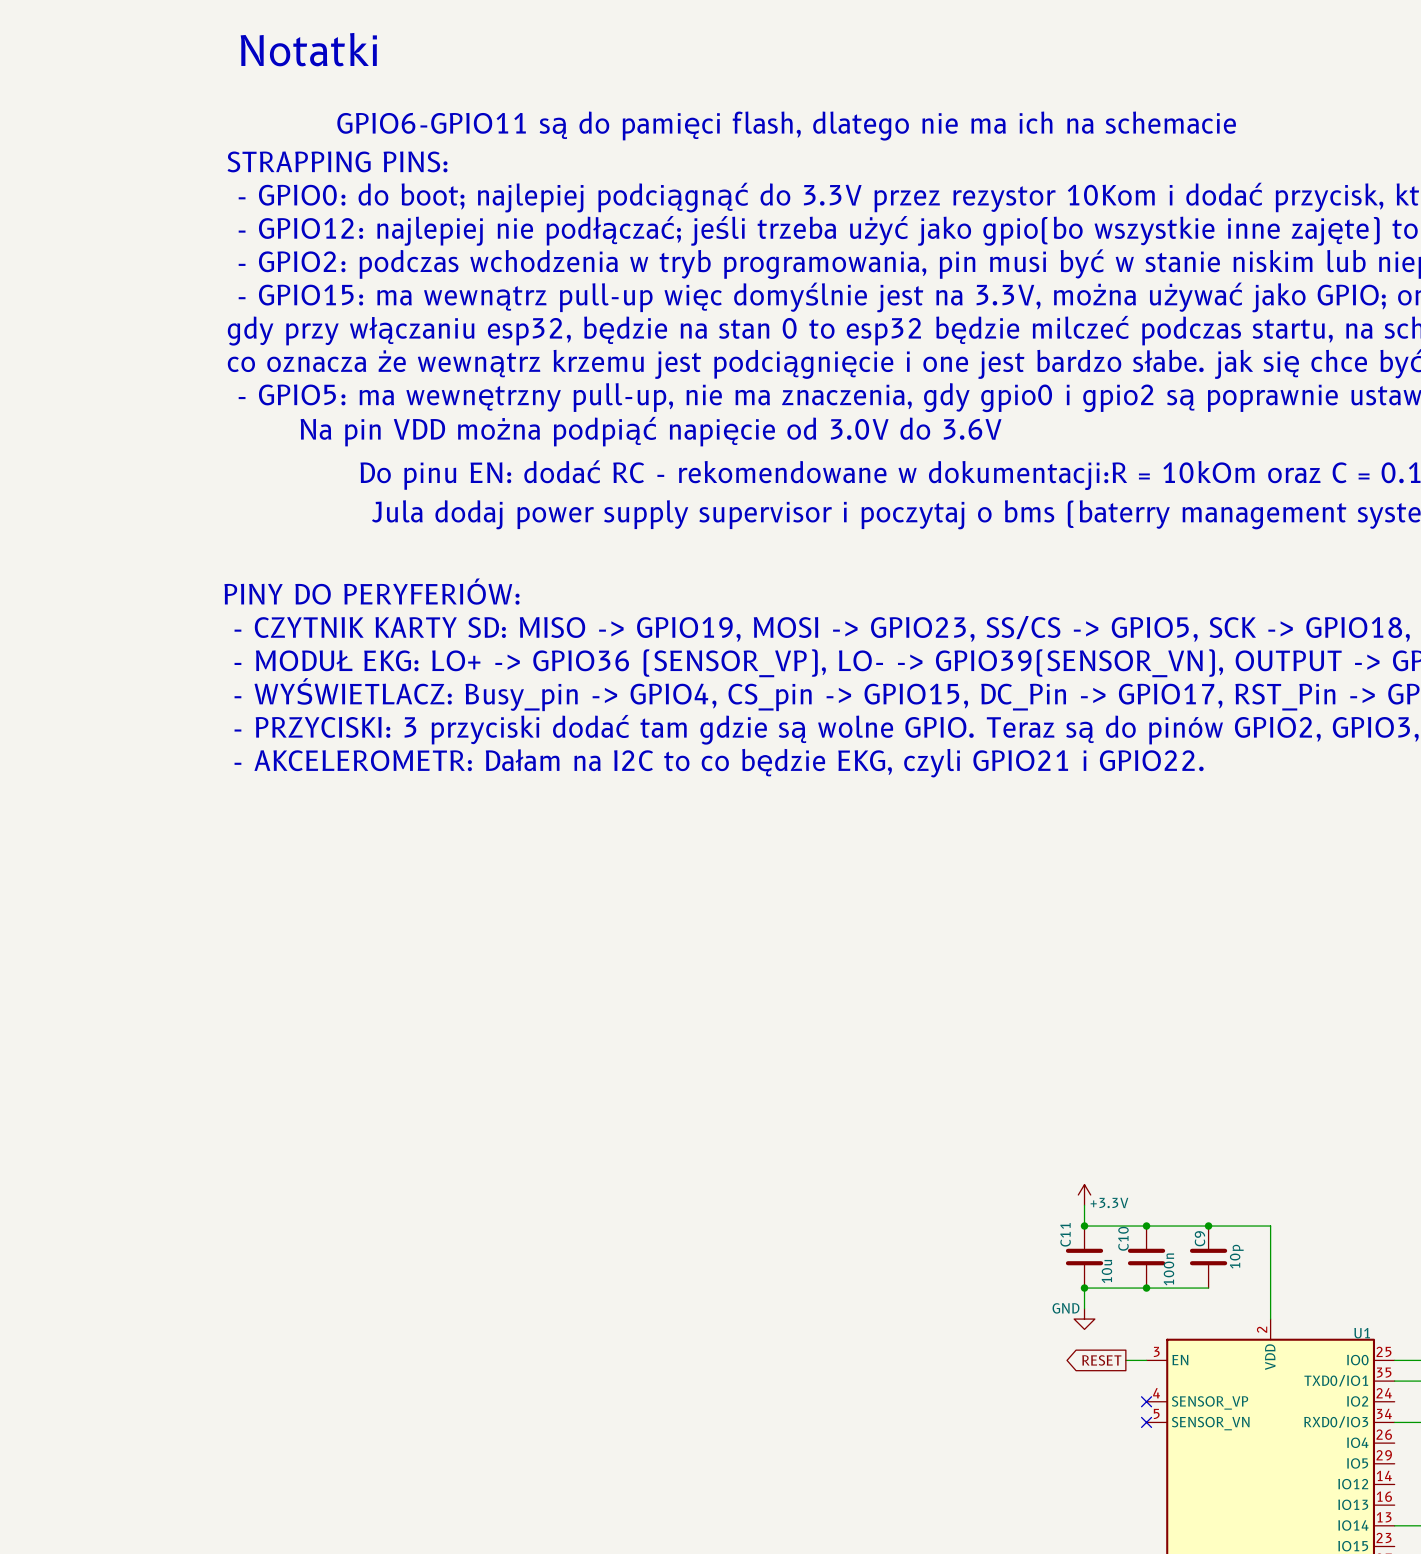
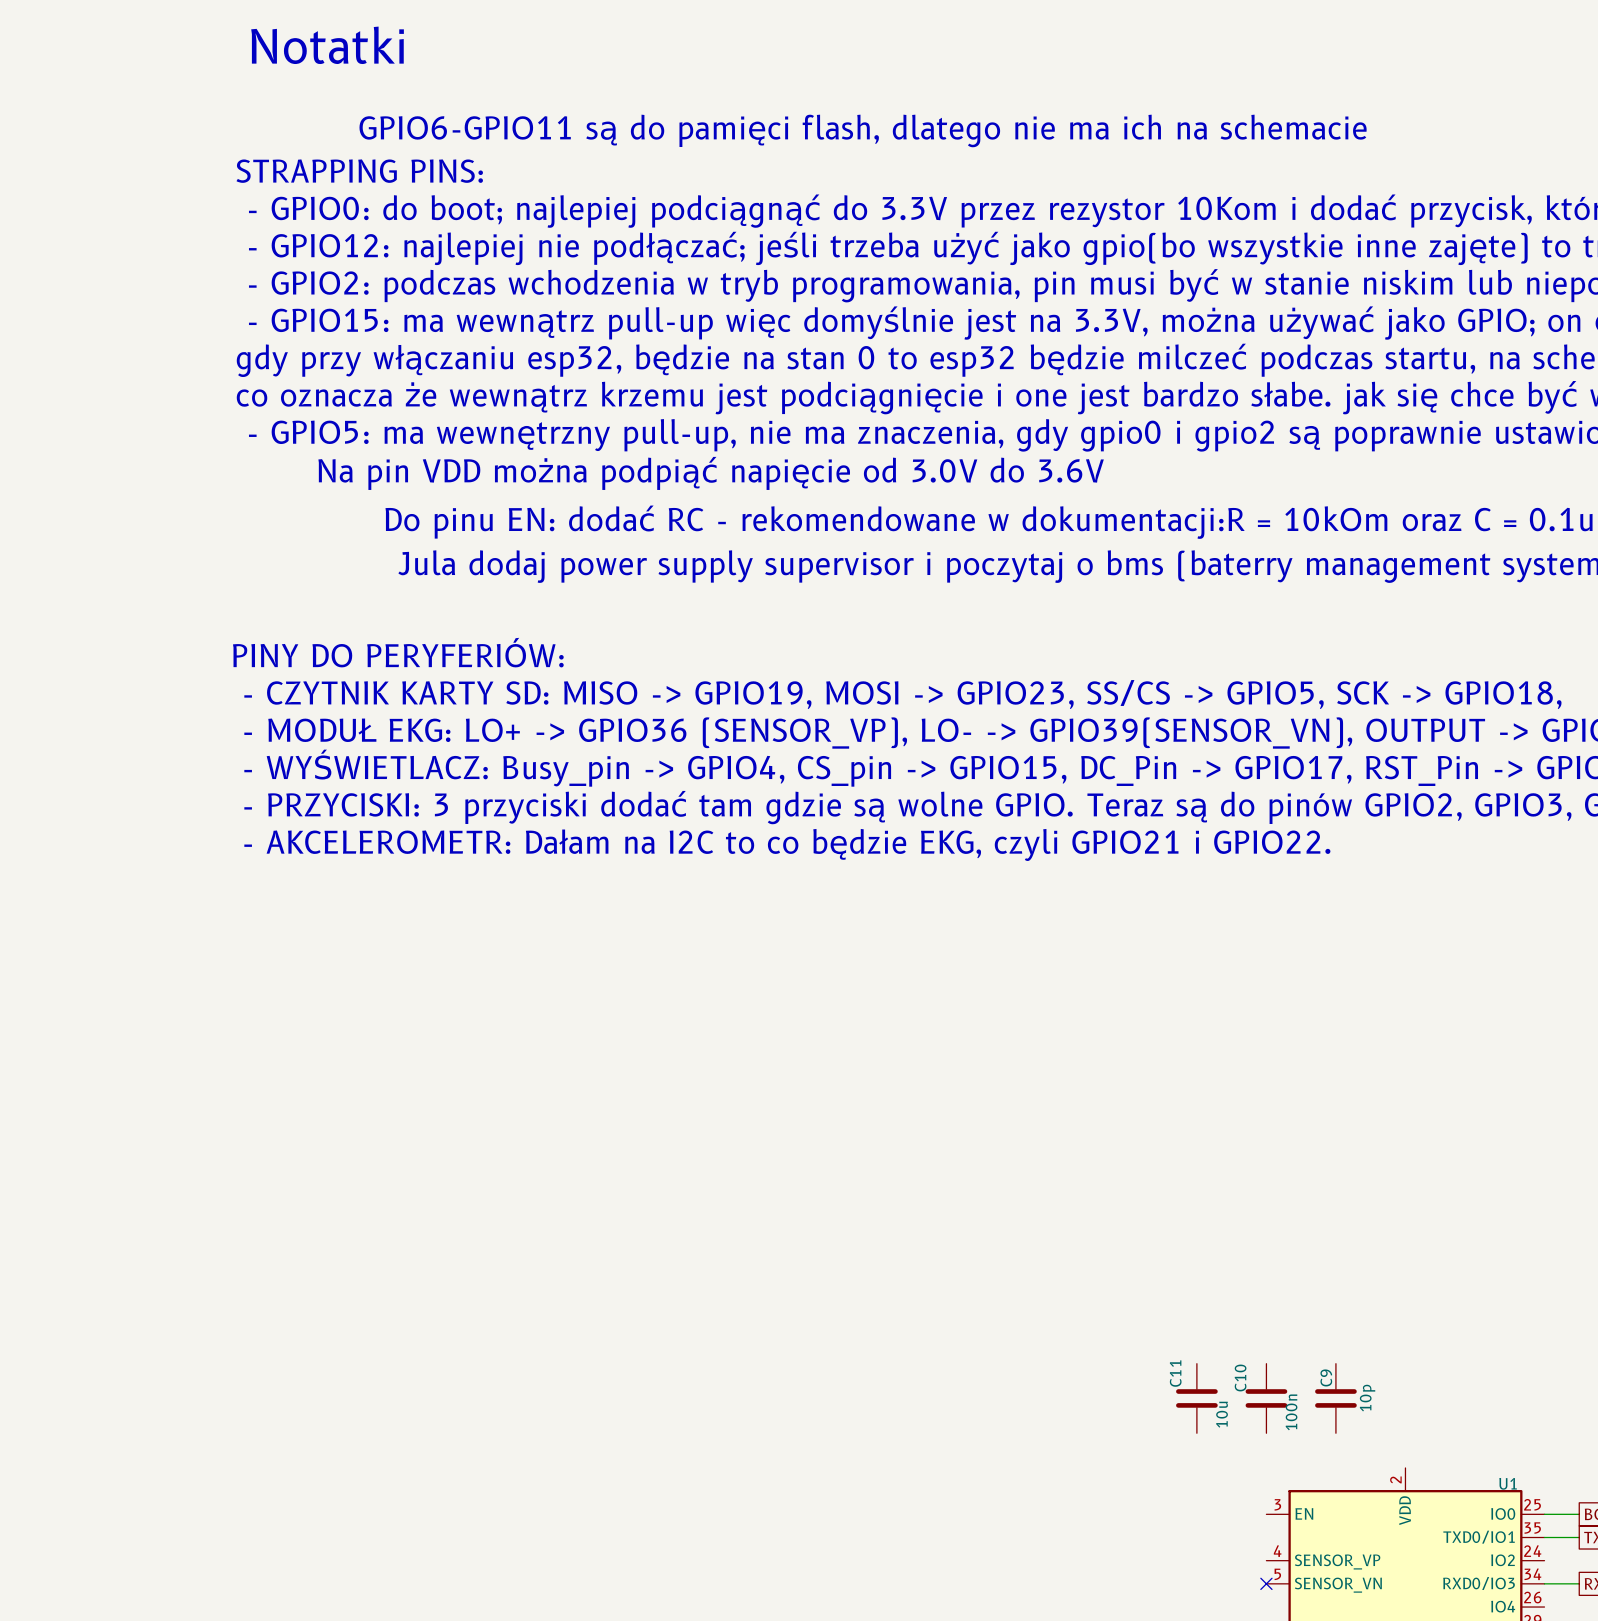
power symbol: +3.3V (1084, 1194) -> none
wire: (1084, 1205) (1084, 1226) (1270, 1226) (1270, 1319) -> none
junction: (1084, 1226) -> none
junction: (1146, 1226) -> none
junction: (1208, 1226) -> none
junction: (1084, 1288) -> none
junction: (1146, 1288) -> none
wire: (1208, 1288) (1084, 1288) (1084, 1308) -> none
power symbol: GND (1084, 1319) -> none
global label: RESET (1101, 1360) -> none
wire: (1125, 1360) (1146, 1360) -> none
no-connect mark: (1146, 1401) -> none

